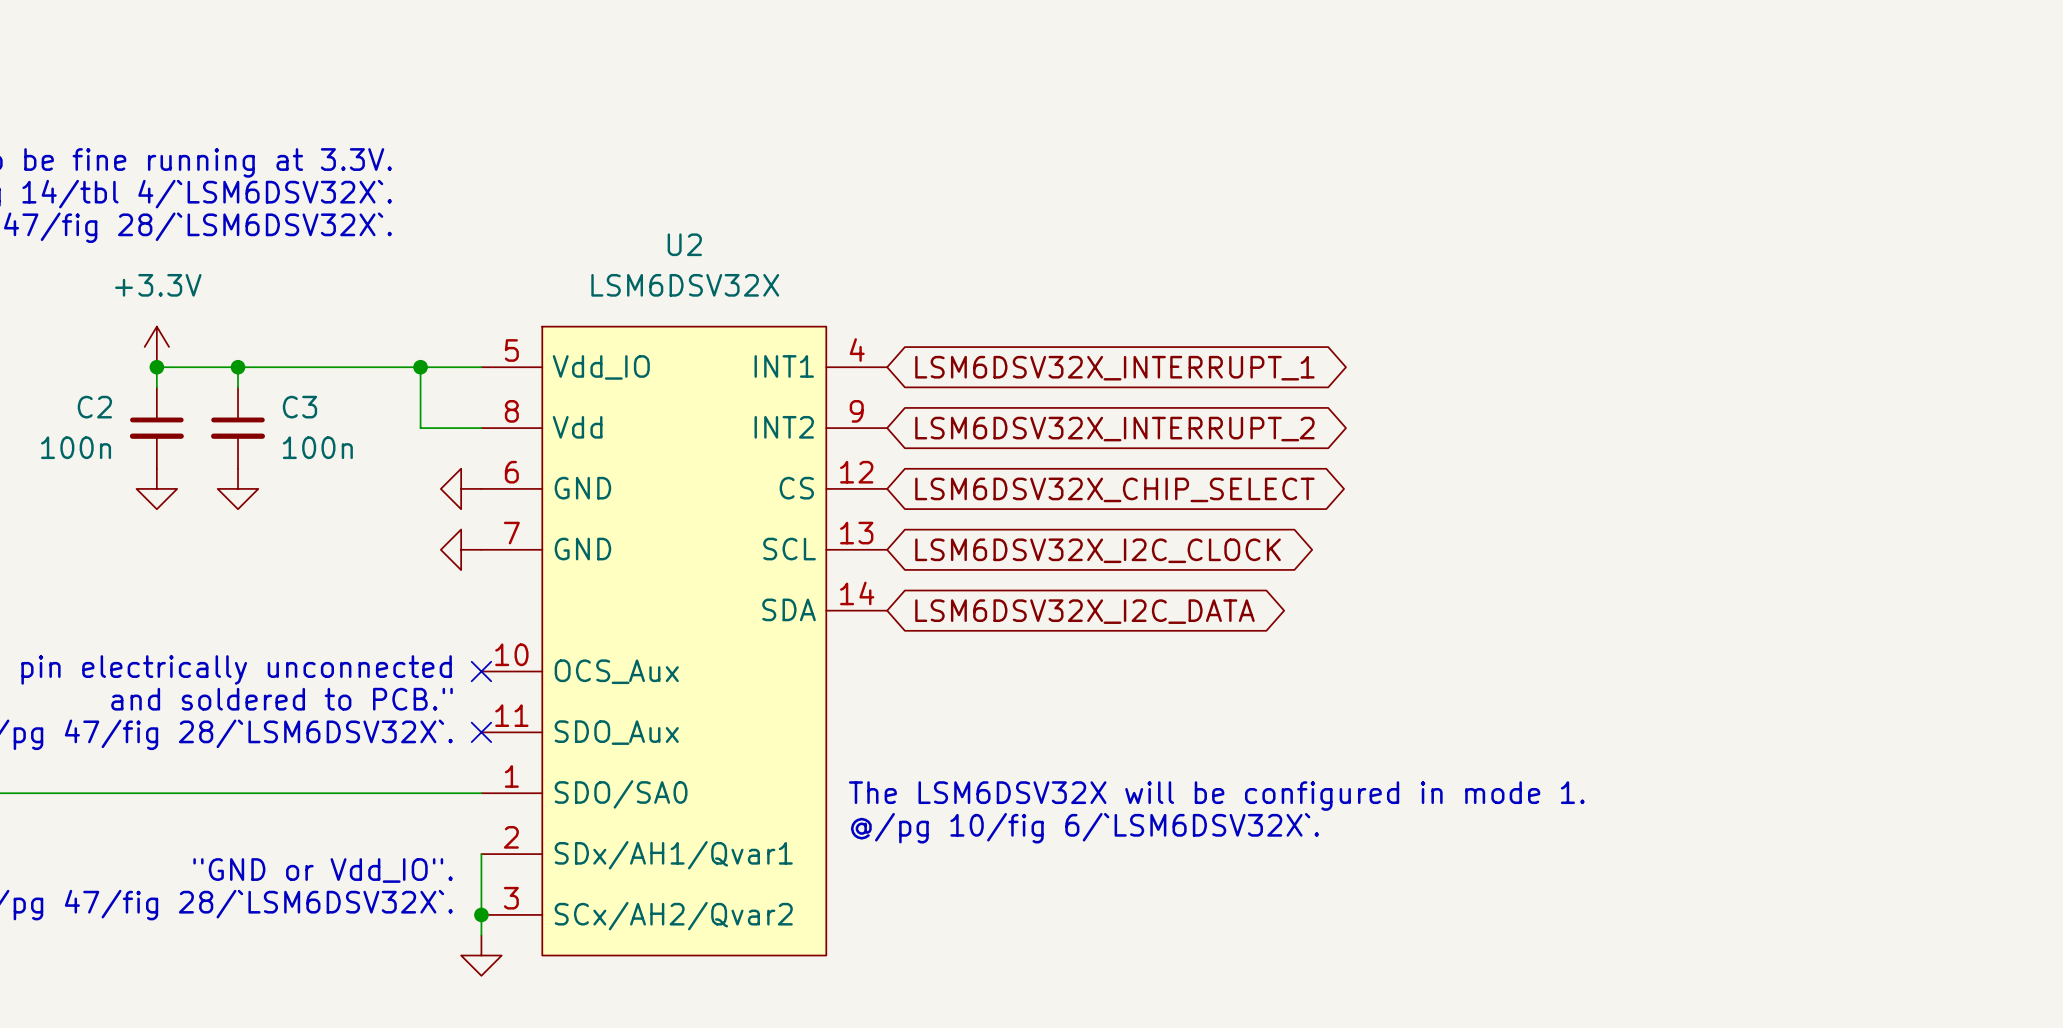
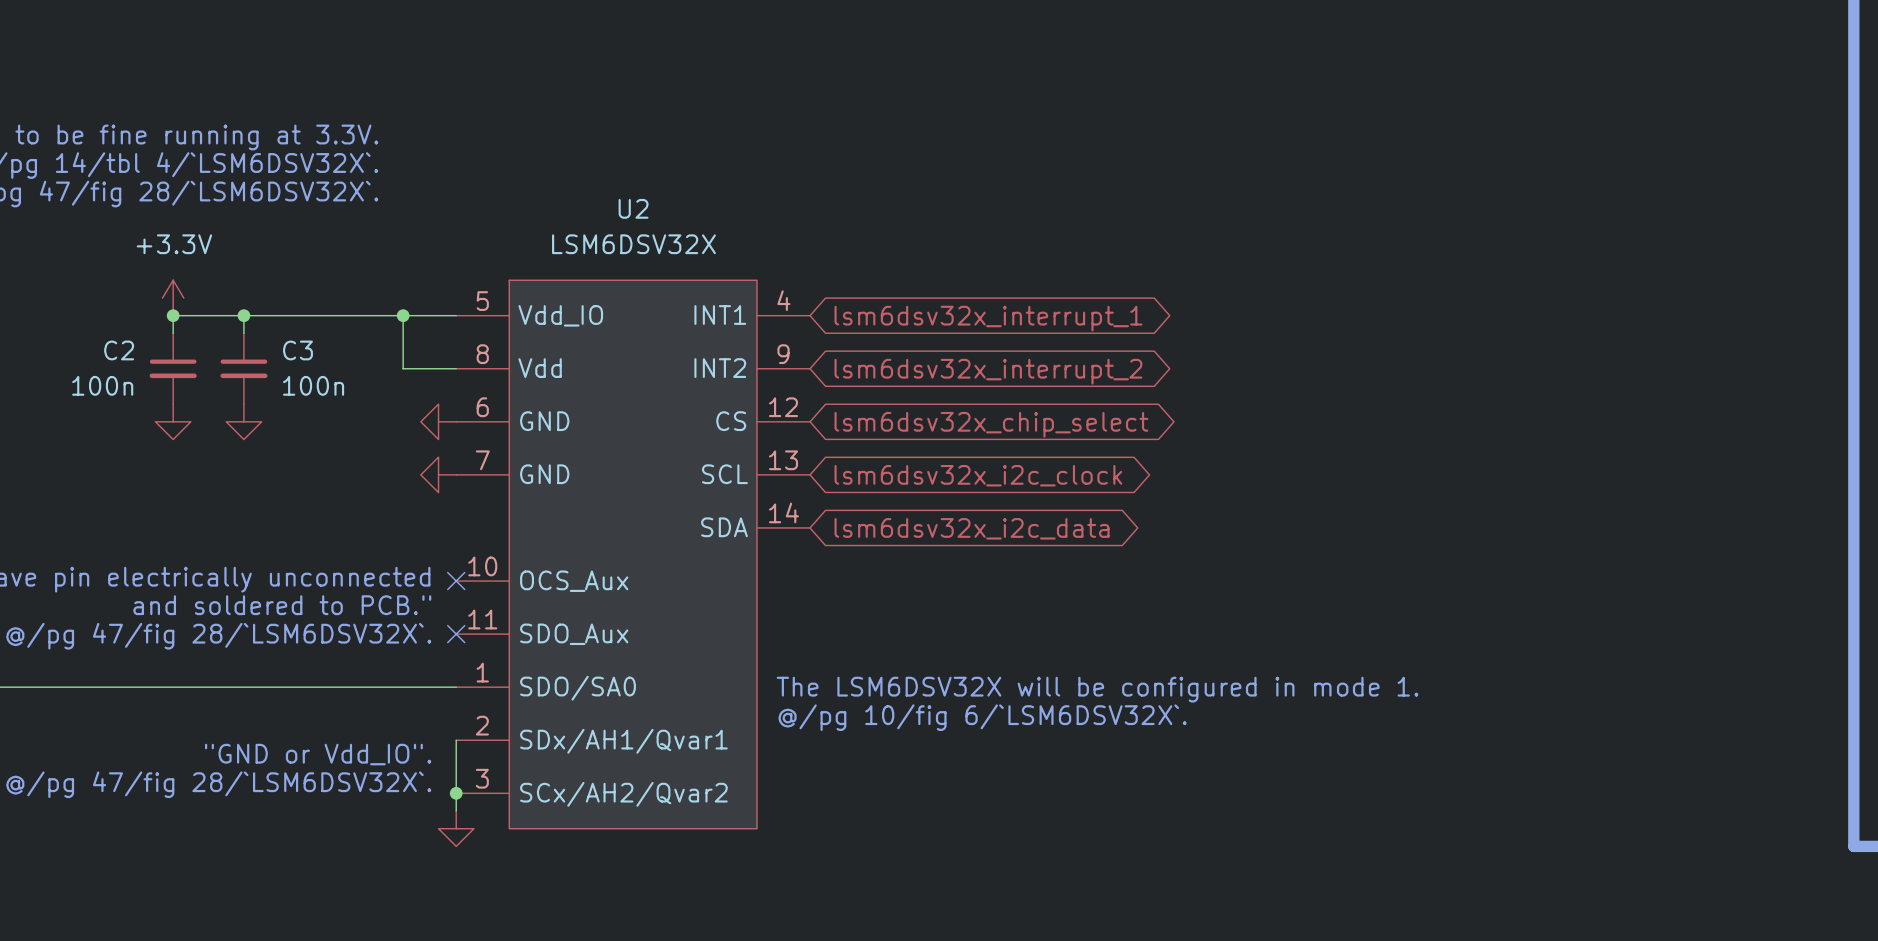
global label: LSM6DSV32X_INTERRUPT_1 (1114, 368) -> lsm6dsv32x_interrupt_1 (988, 318)
global label: LSM6DSV32X_INTERRUPT_2 (1114, 429) -> lsm6dsv32x_interrupt_2 (988, 371)
global label: LSM6DSV32X_CHIP_SELECT (1114, 489) -> lsm6dsv32x_chip_select (991, 424)
global label: LSM6DSV32X_I2C_CLOCK (1098, 550) -> lsm6dsv32x_i2c_clock (978, 475)
global label: LSM6DSV32X_I2C_DATA (1084, 611) -> lsm6dsv32x_i2c_data (972, 528)

